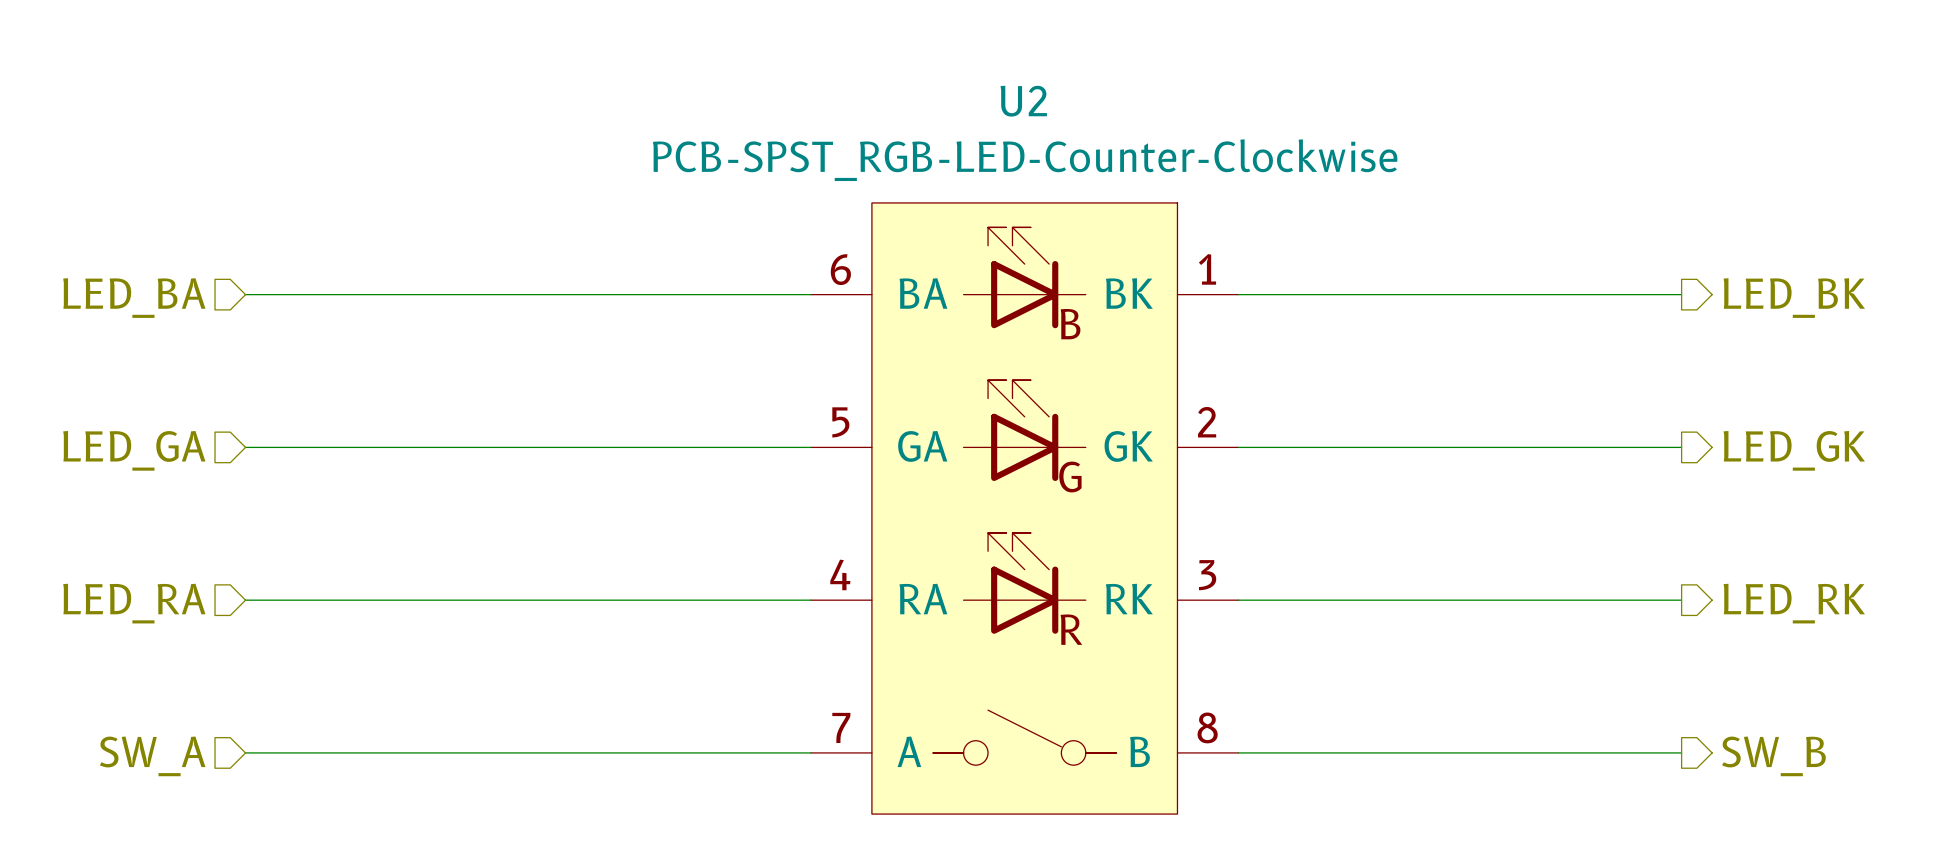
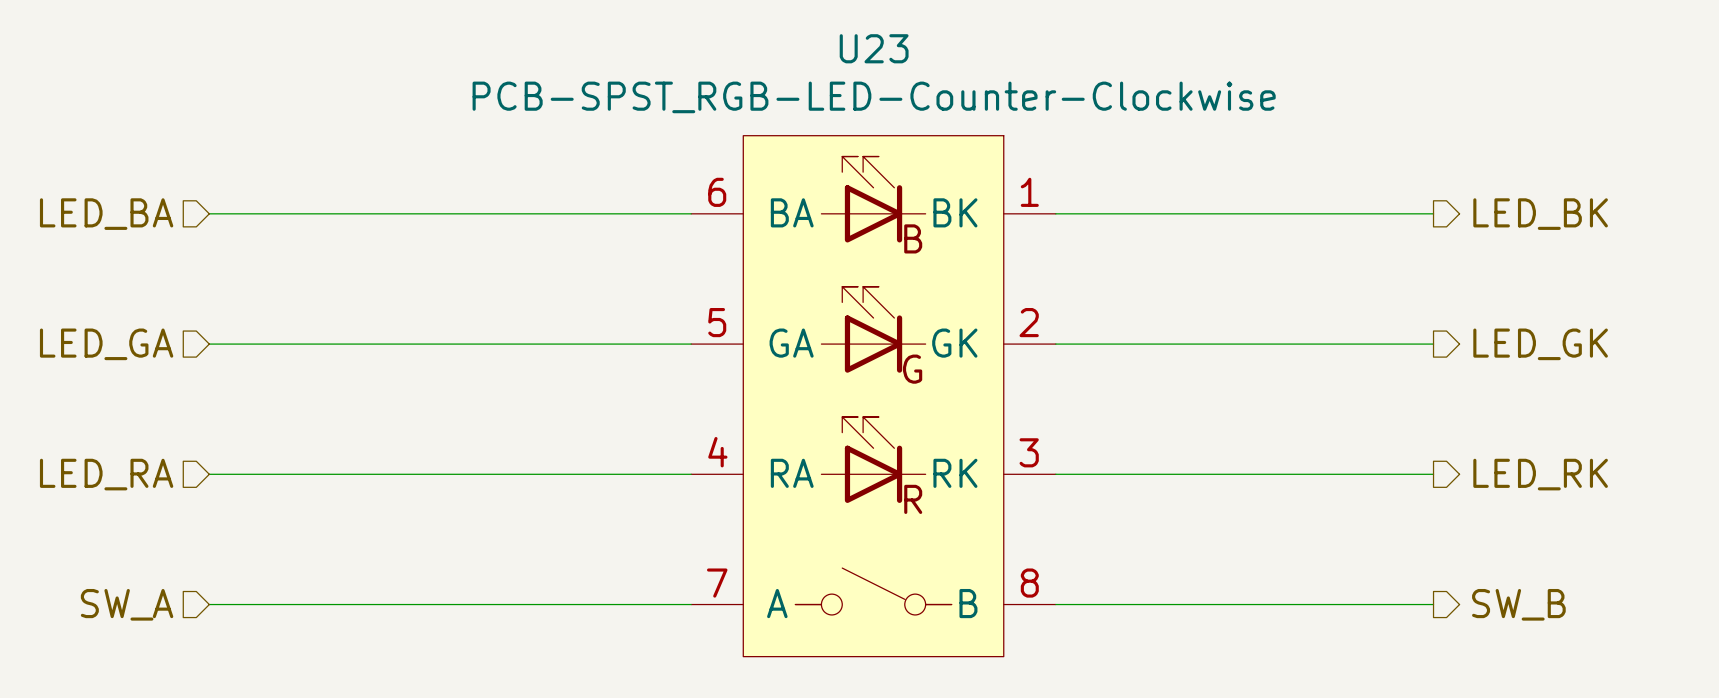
U2 name: U2 (1023, 101) -> U23 (874, 48)

